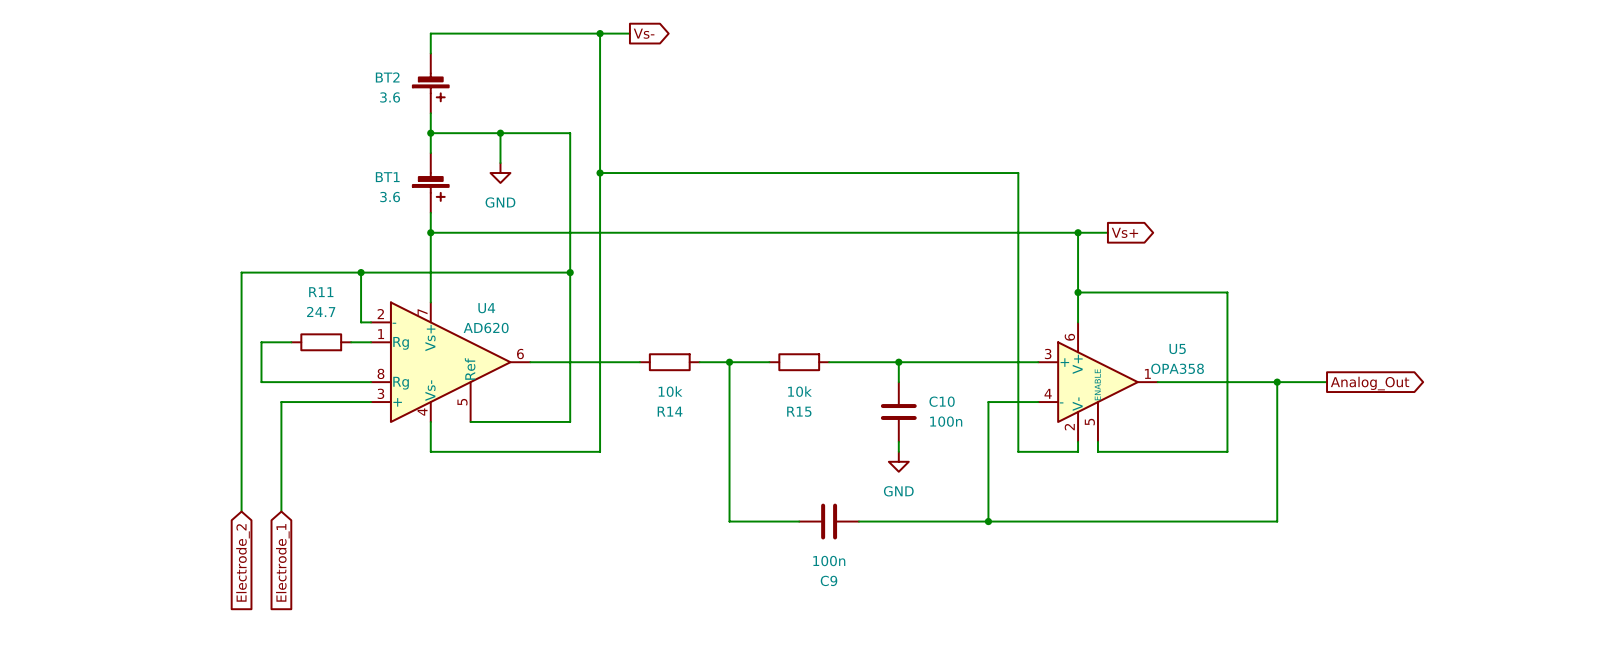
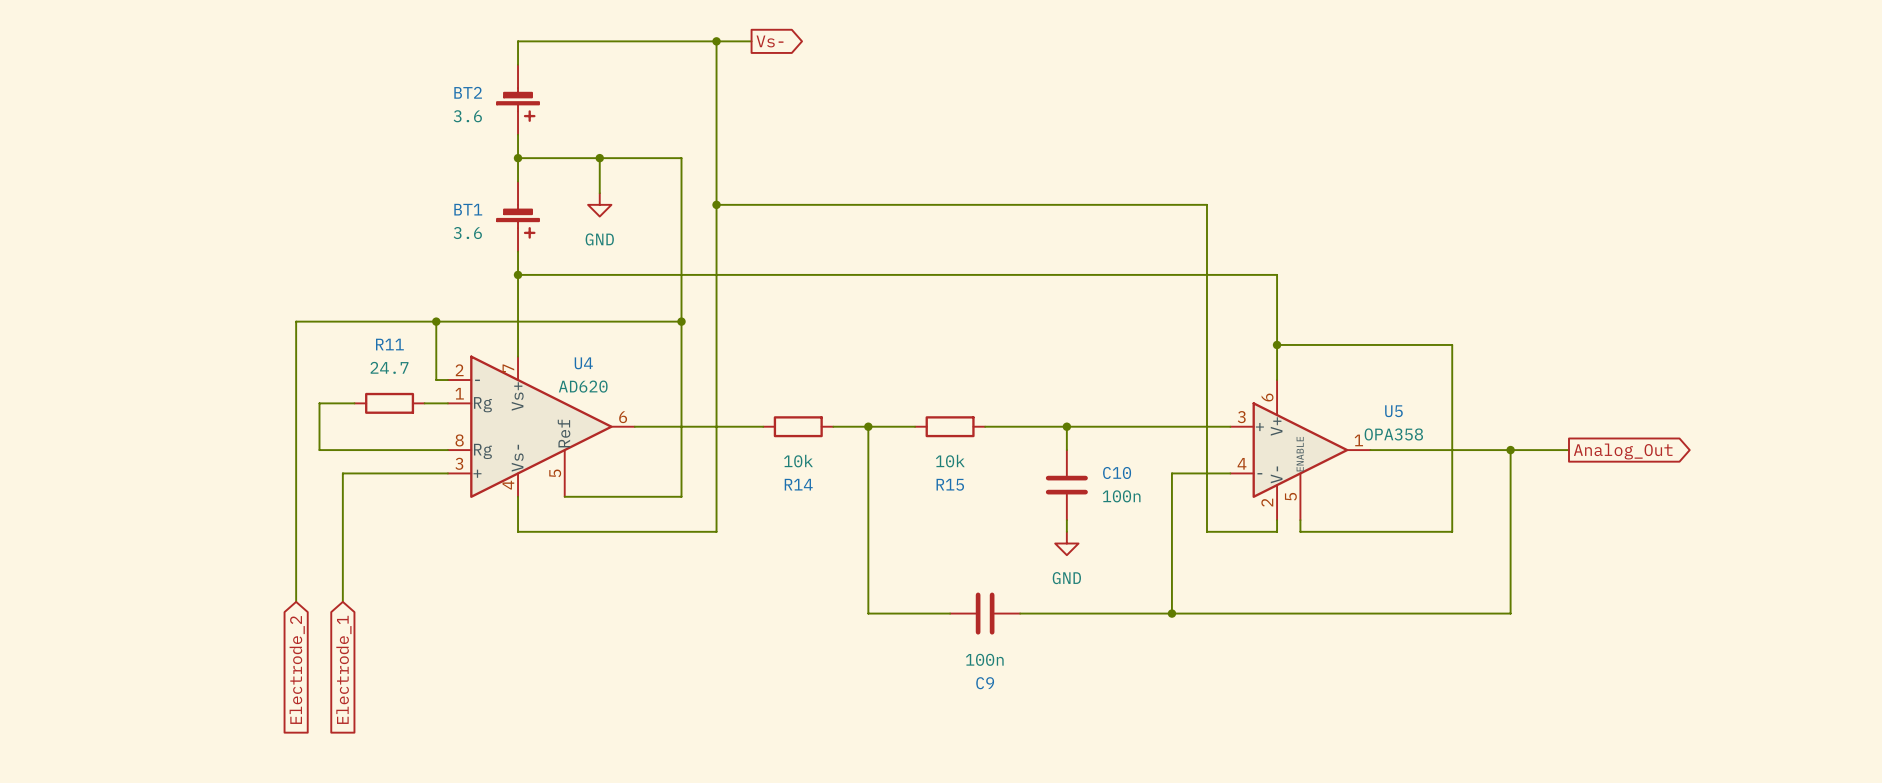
wire: (1078, 232) (1107, 232) -> none
junction: (1078, 232) -> none
global label: Vs+ (1124, 232) -> none

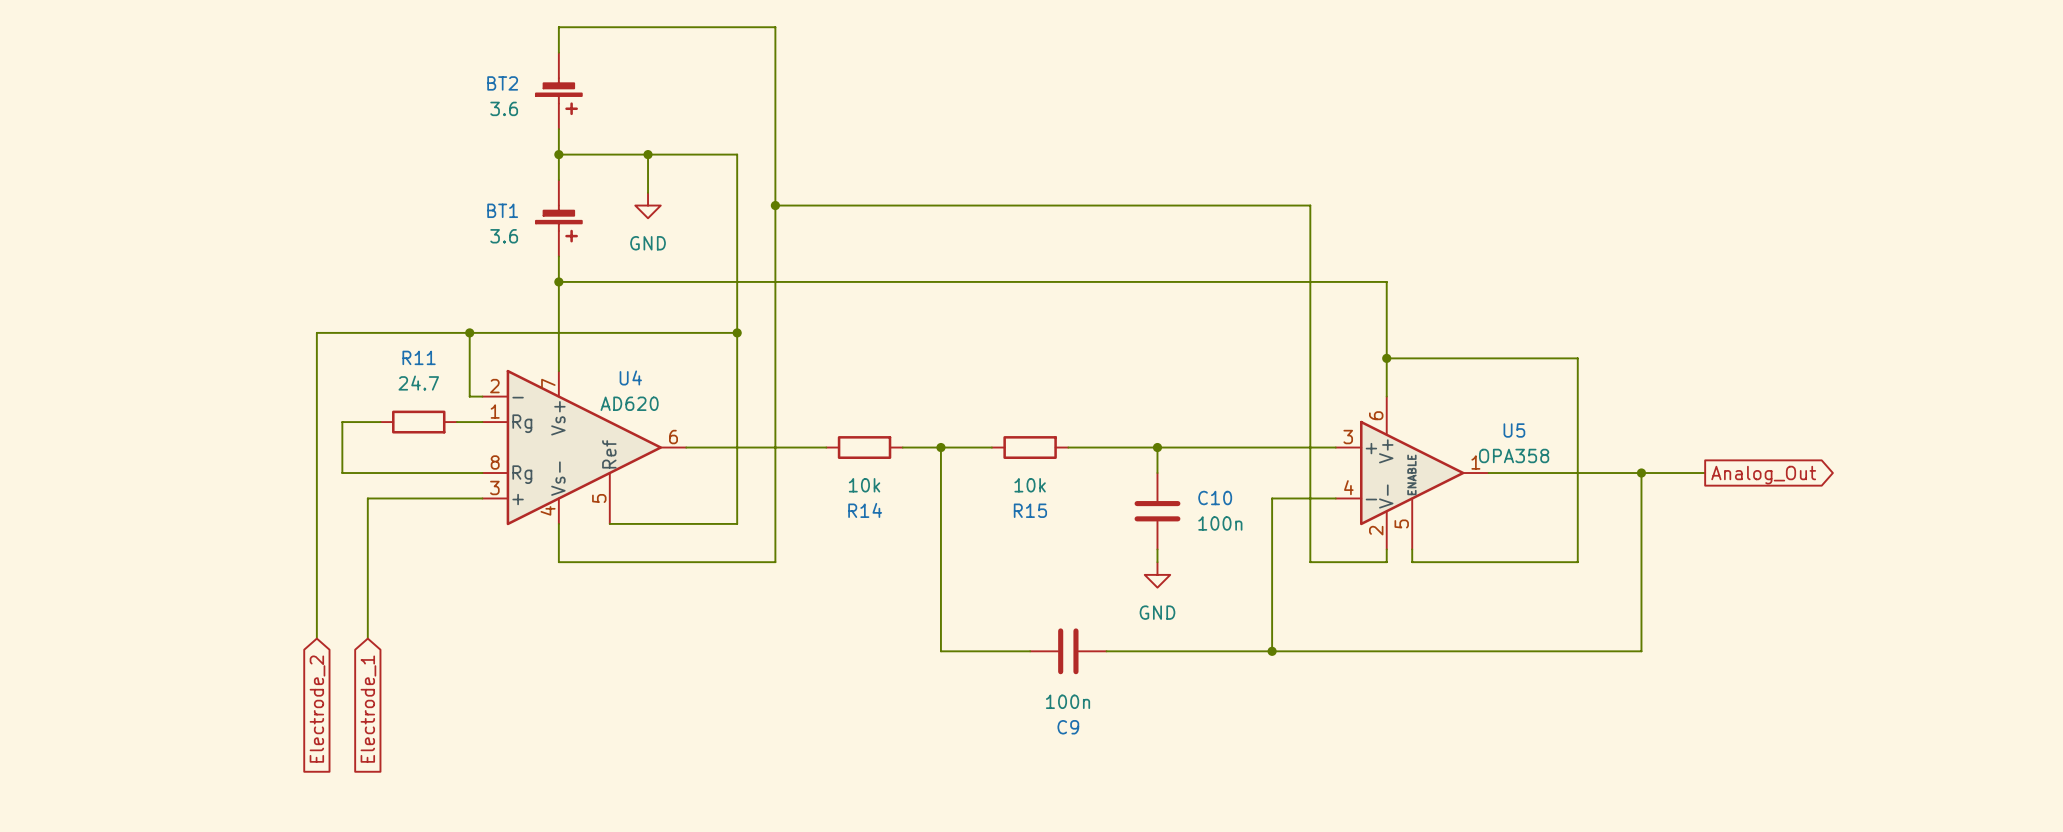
wire: (716, 41) (751, 41) -> none
junction: (716, 41) -> none
global label: Vs- (770, 41) -> none

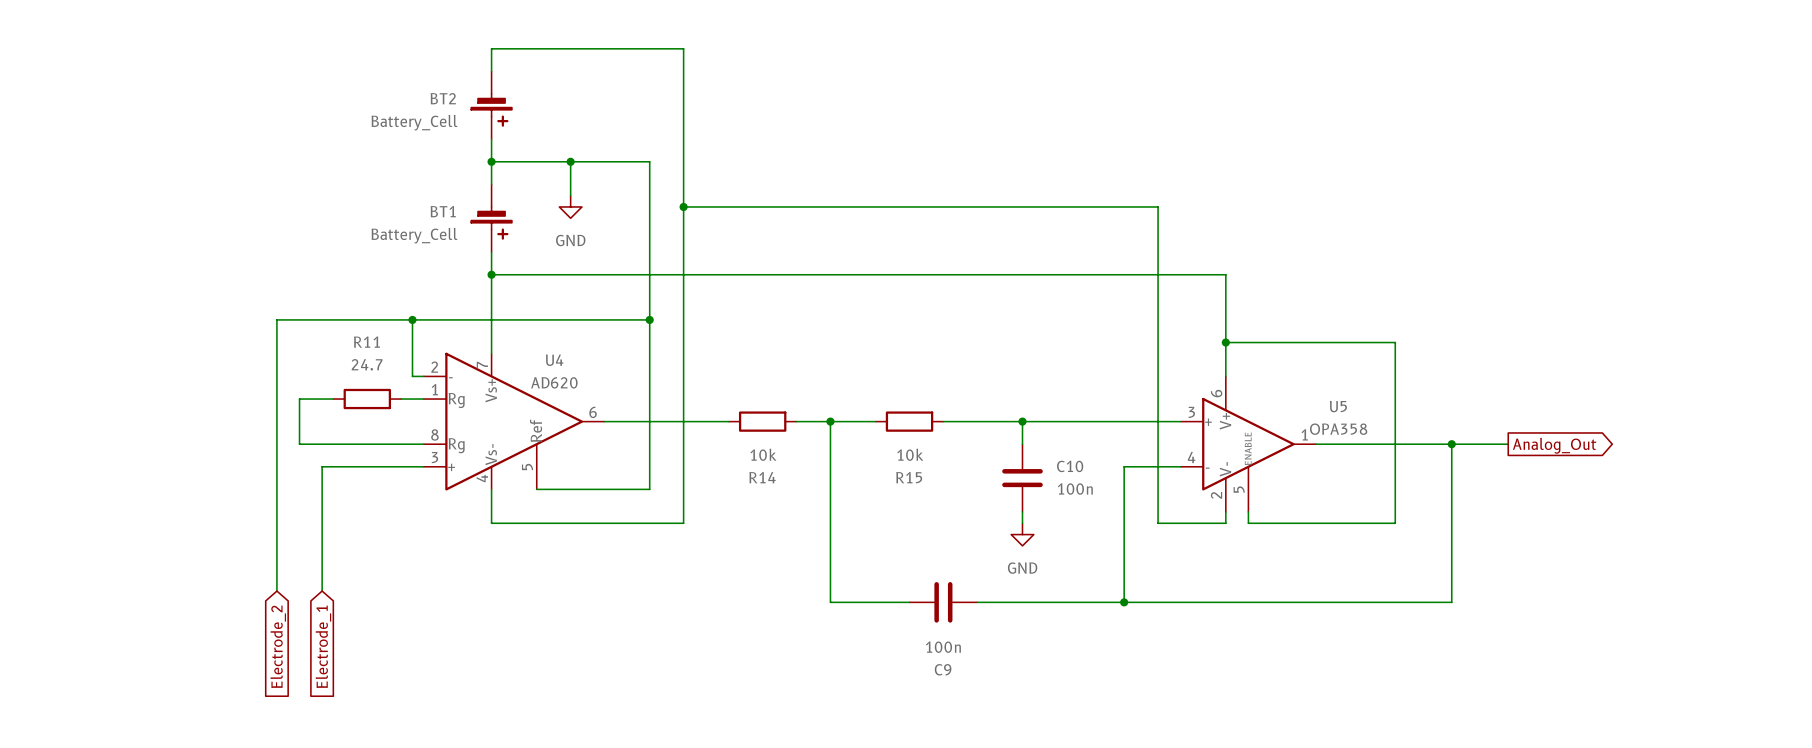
BT2 value: 3.6 (504, 108) -> Battery_Cell (414, 122)
BT1 value: 3.6 (504, 236) -> Battery_Cell (414, 235)

